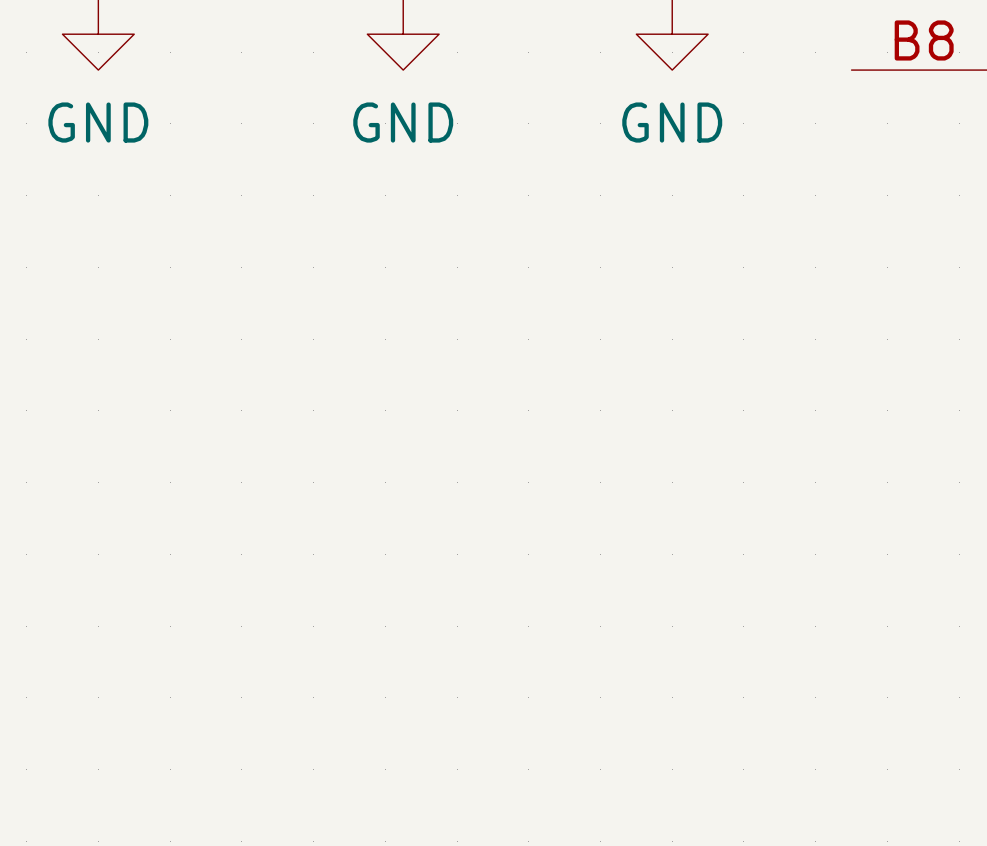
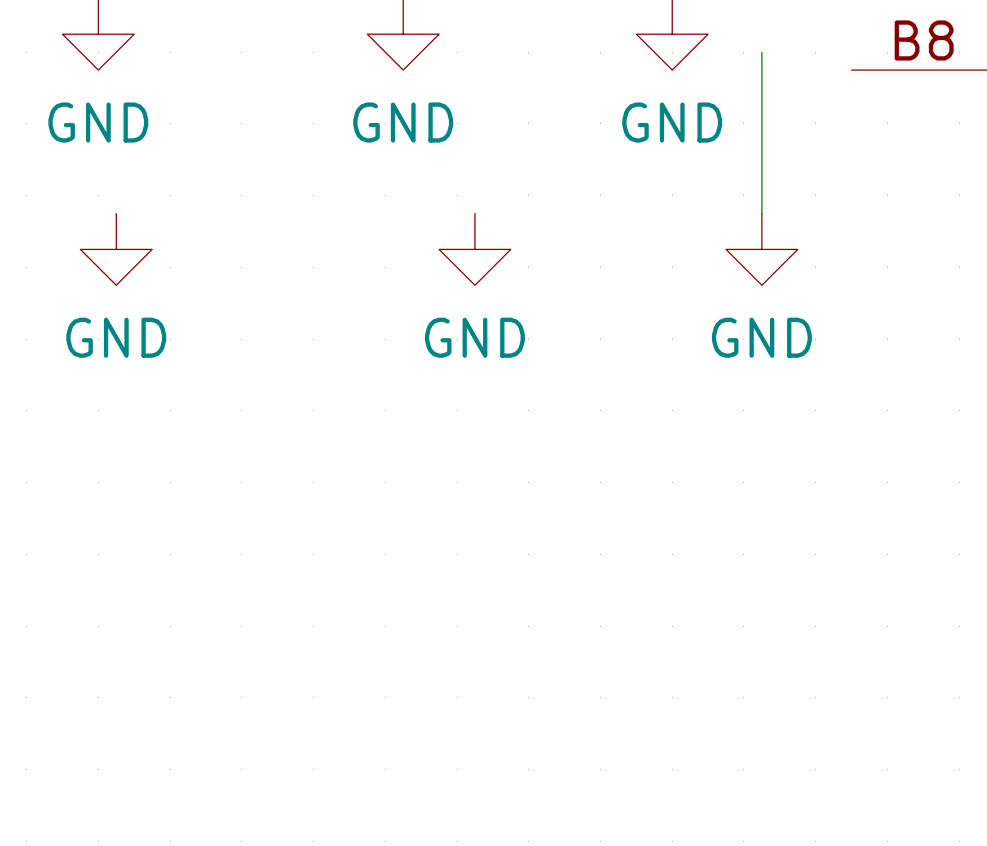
wire: none -> (761, 52) (761, 213)
power symbol: none -> GND (116, 249)
power symbol: none -> GND (474, 249)
power symbol: none -> GND (761, 249)

